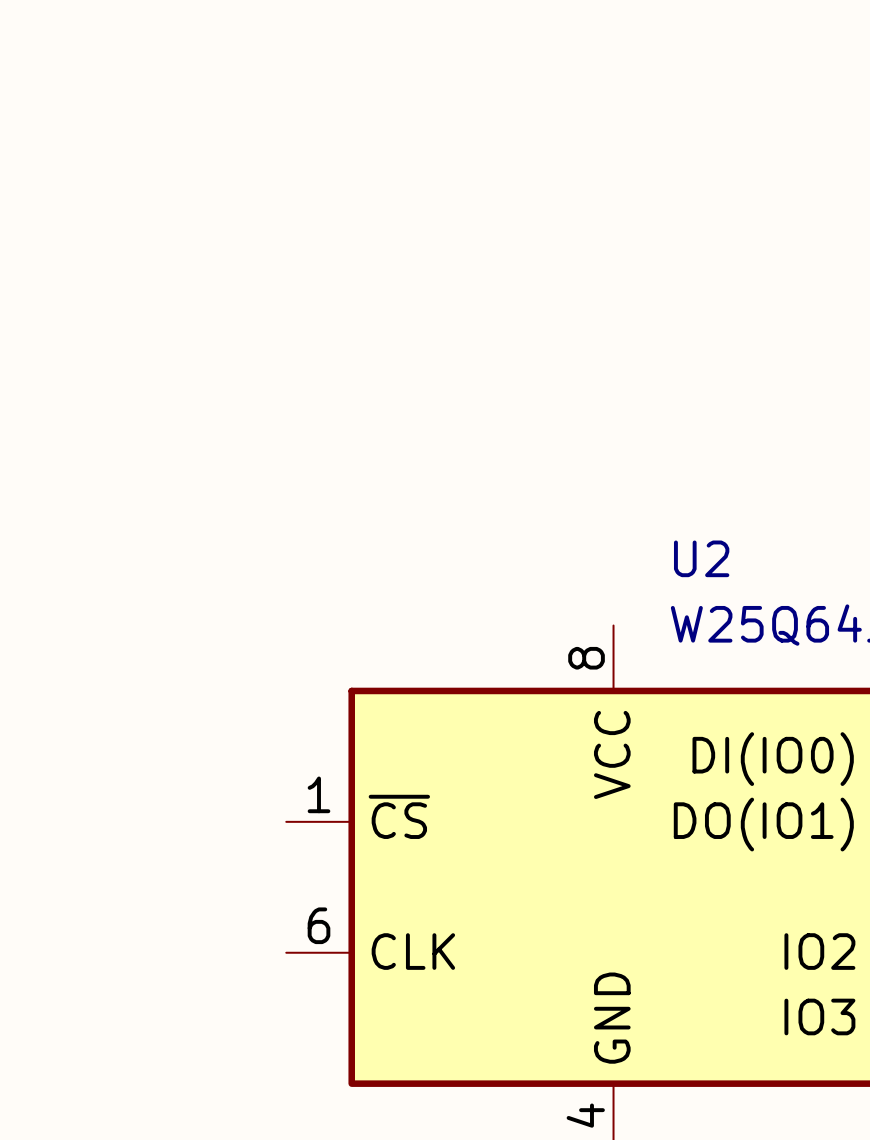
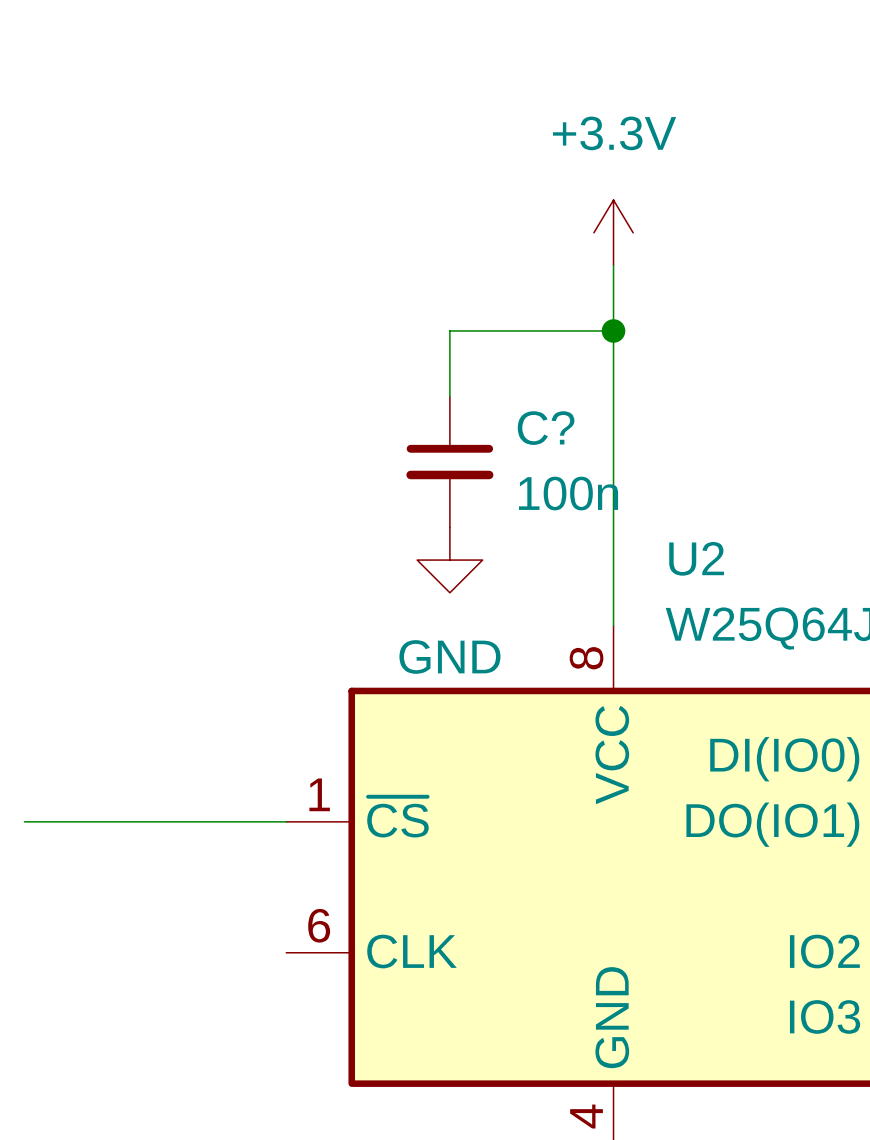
power symbol: none -> +3.3V (613, 232)
wire: none -> (613, 265) (613, 625)
wire: none -> (613, 330) (449, 330) (449, 396)
junction: none -> (613, 330)
C?: none -> 100n (449, 461)
power symbol: none -> GND (449, 560)
wire: none -> (24, 821) (286, 821)

